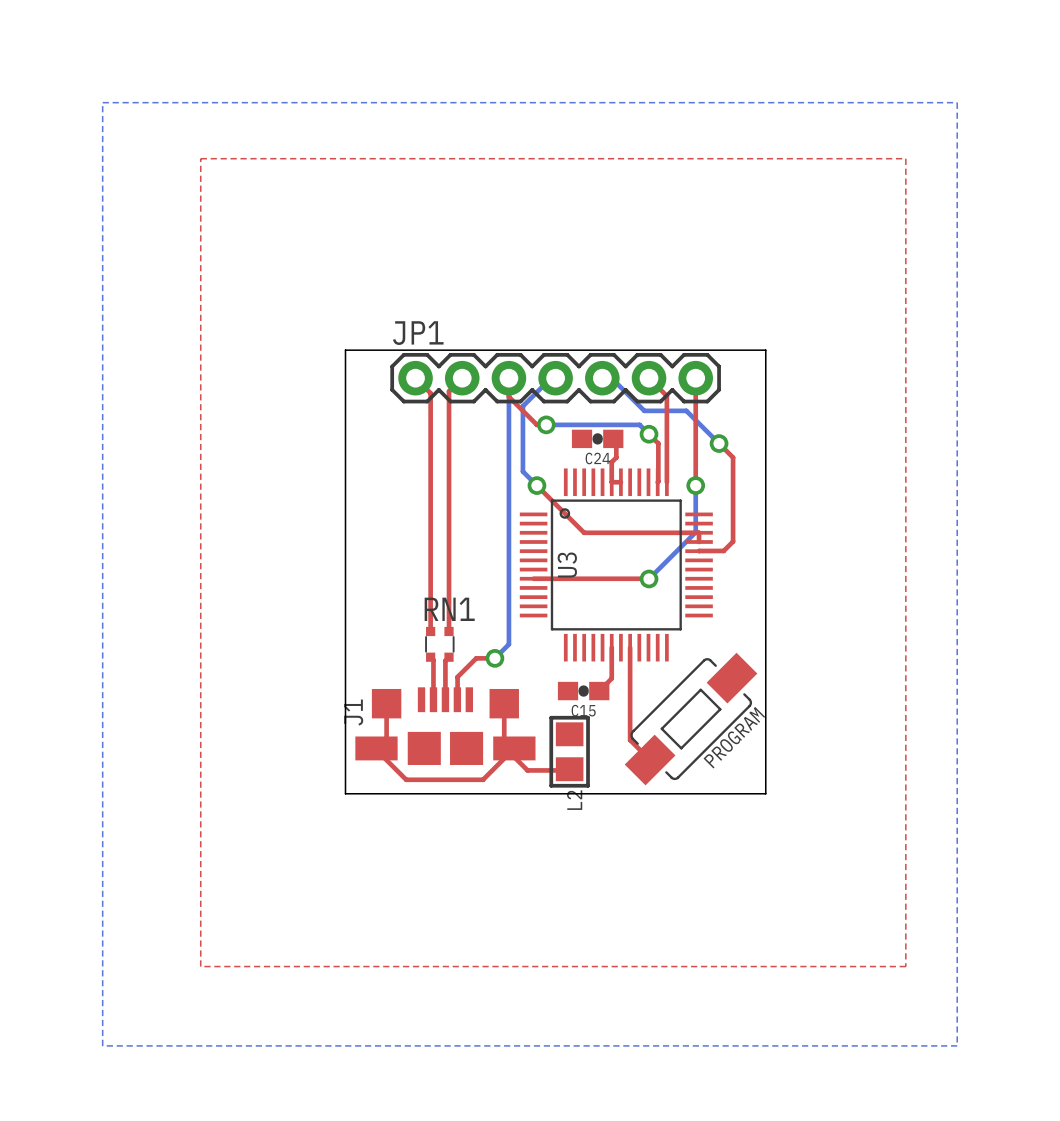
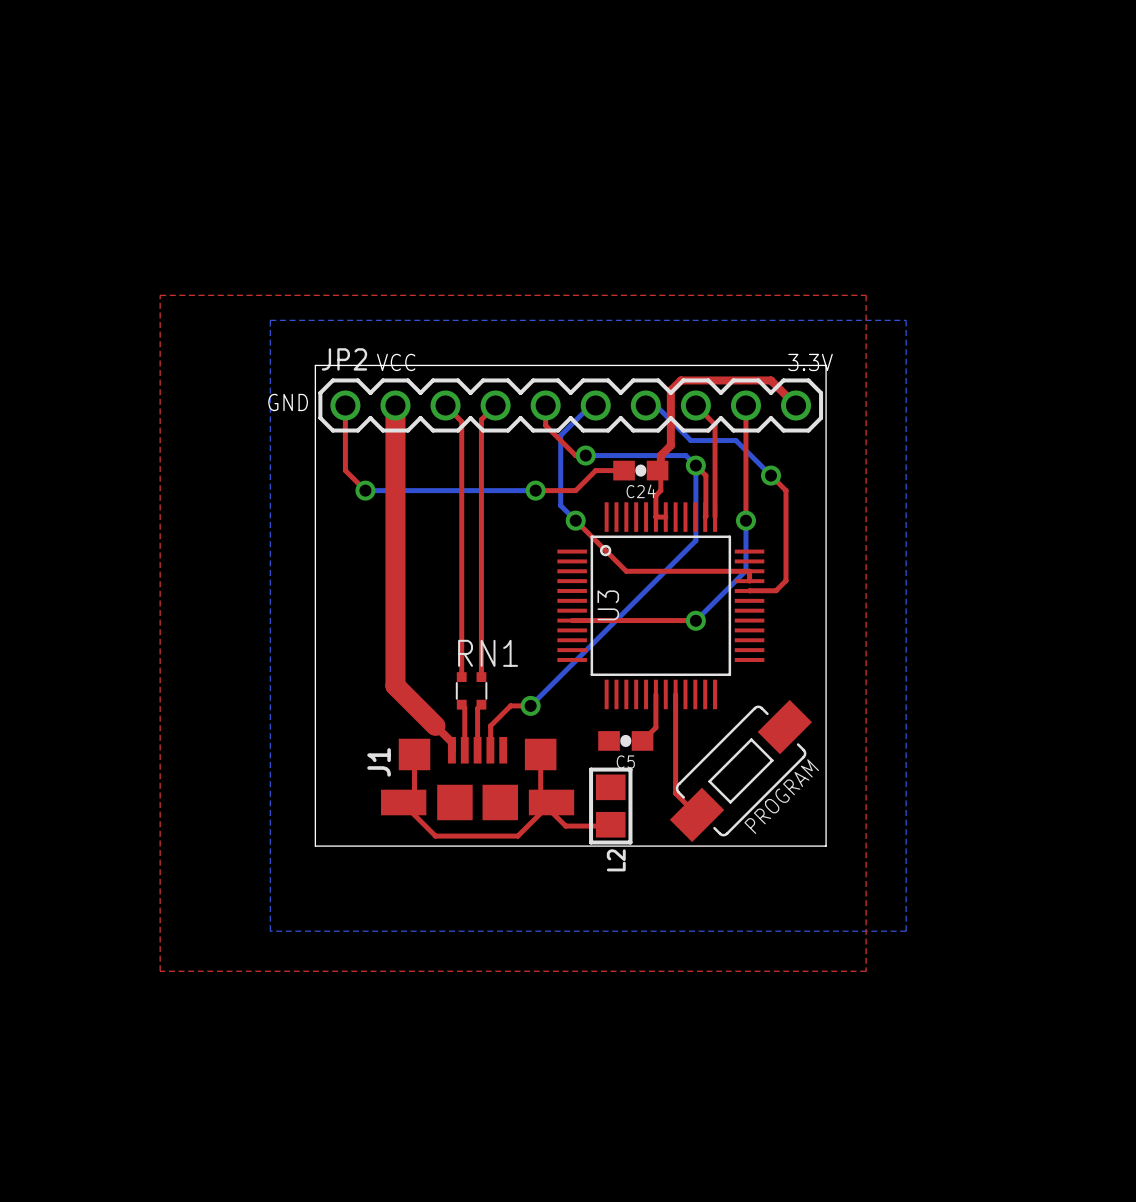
bottom zone outline: (102, 102) (957, 102) (957, 1045) (102, 1045) (102, 102) -> none
top zone outline: (200, 158) (905, 158) (905, 966) (200, 966) (200, 158) -> (160, 295) (160, 971) (866, 971) (866, 295) (160, 295)
bottom zone outline: none -> (270, 320) (906, 320) (906, 931) (270, 931) (270, 320)
text: none -> VCC (396, 362)
text: none -> 3.3V (810, 362)
board edge: (345, 350) (765, 350) (765, 793) (345, 793) (345, 350) -> (315, 365) (315, 846) (826, 846) (826, 365) (315, 365)
text: none -> GND (288, 402)
top track: none -> (345, 405) (345, 470) (365, 490)
top track: none -> (395, 405) (395, 685) (451, 742) (451, 750)
bottom track: (508, 378) (508, 644) -> (695, 465) (695, 540) (545, 690)
JP2: none -> (570, 405)
JP1: (555, 378) -> none
top track: none -> (796, 405) (770, 380) (680, 380) (670, 390) (670, 445) (660, 455) (660, 473)
top track: none -> (624, 470) (595, 470) (575, 490) (535, 490)
bottom track: none -> (365, 490) (535, 490)
via: none -> (365, 490)
via: none -> (535, 490)
C15 name: C15 (583, 710) -> C5 (625, 761)

